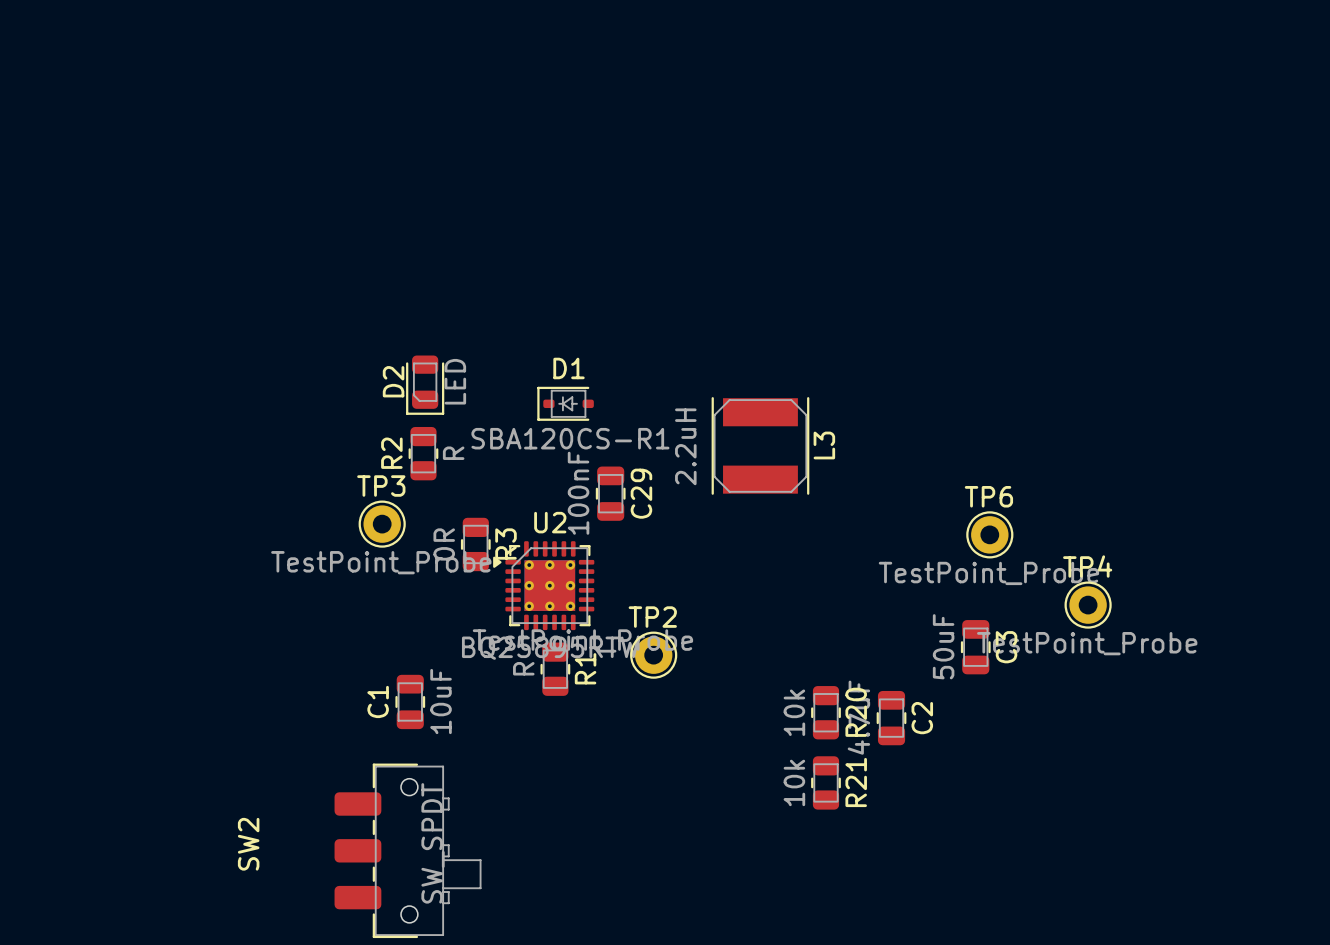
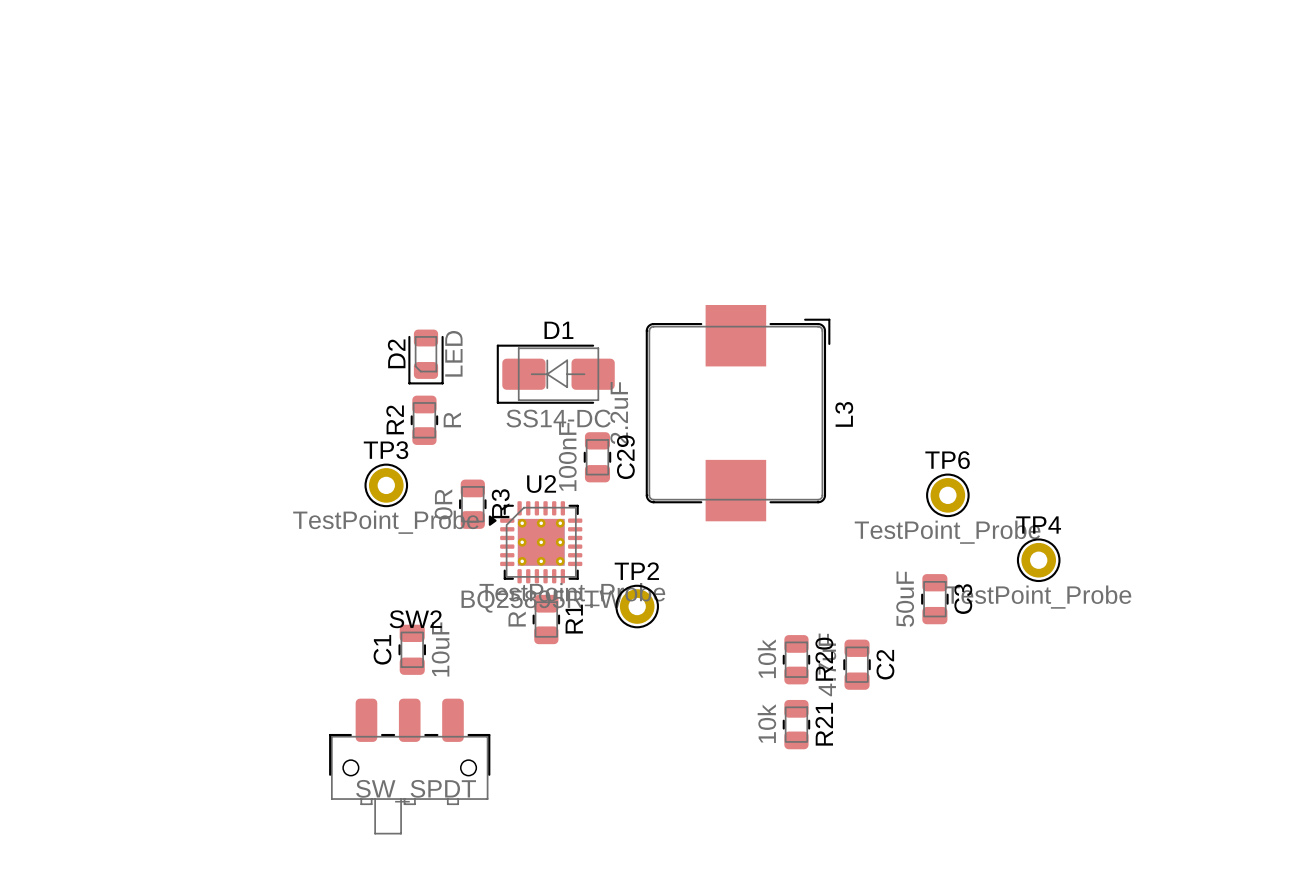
D1 footprint: [537, 386, 594, 421] -> [496, 344, 615, 404]
L3 footprint: [711, 397, 810, 495] -> [645, 305, 831, 522]
D1 value: SBA120CS-R1 (570, 438) -> SS14-DC (558, 418)
L3 name position: L3 (824, 445) -> L3 (844, 414)
L3 value: 2.2uH (685, 446) -> 2.2uF (619, 413)
SW2 rotation: 0° (408, 850) -> 90° clockwise (409, 766)

